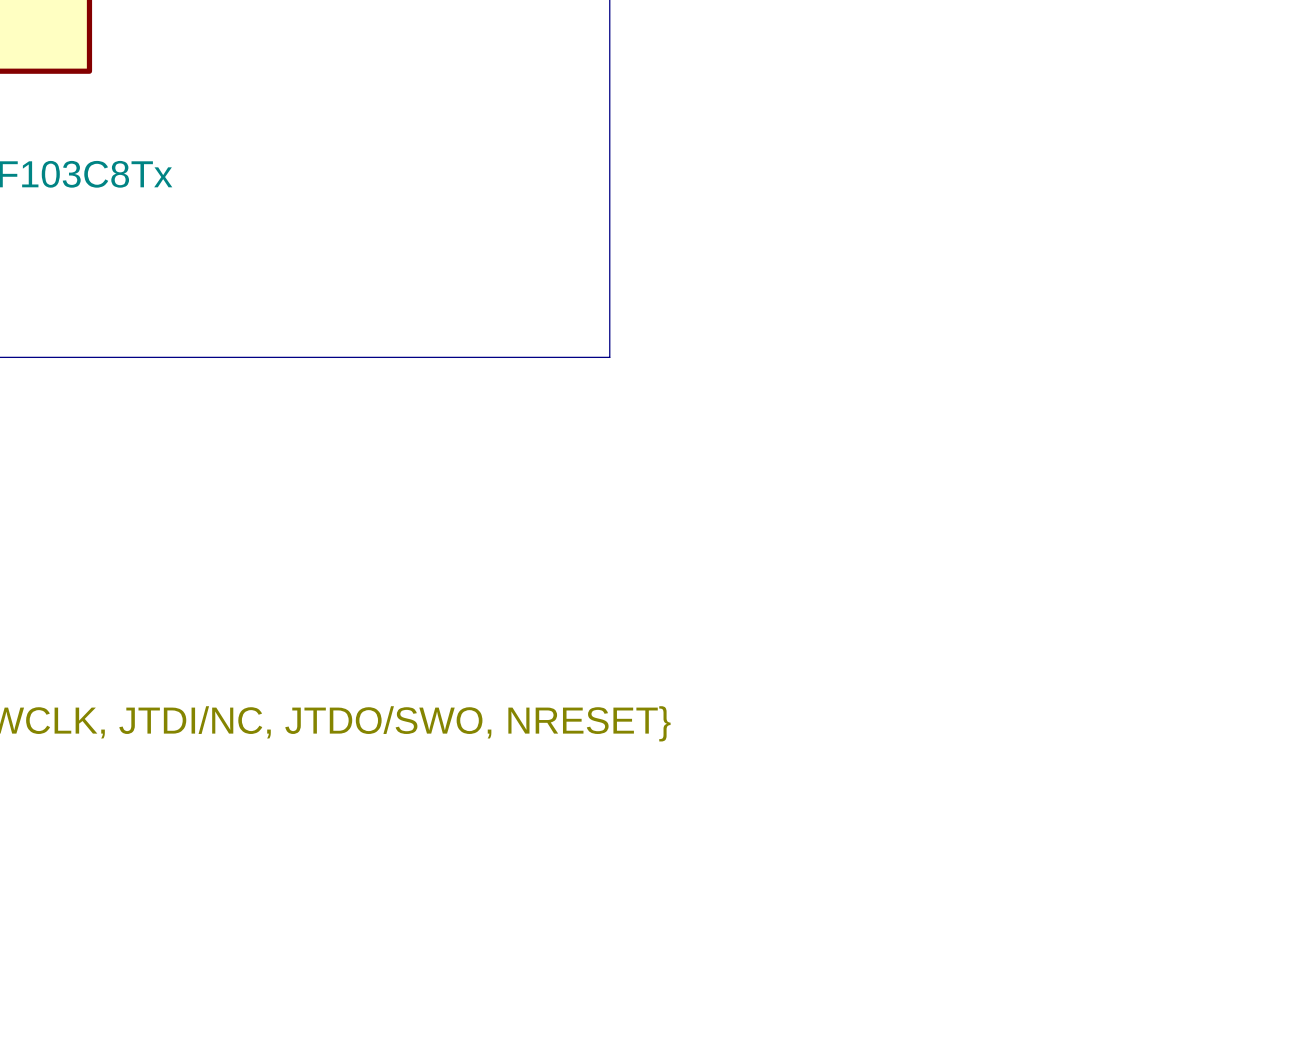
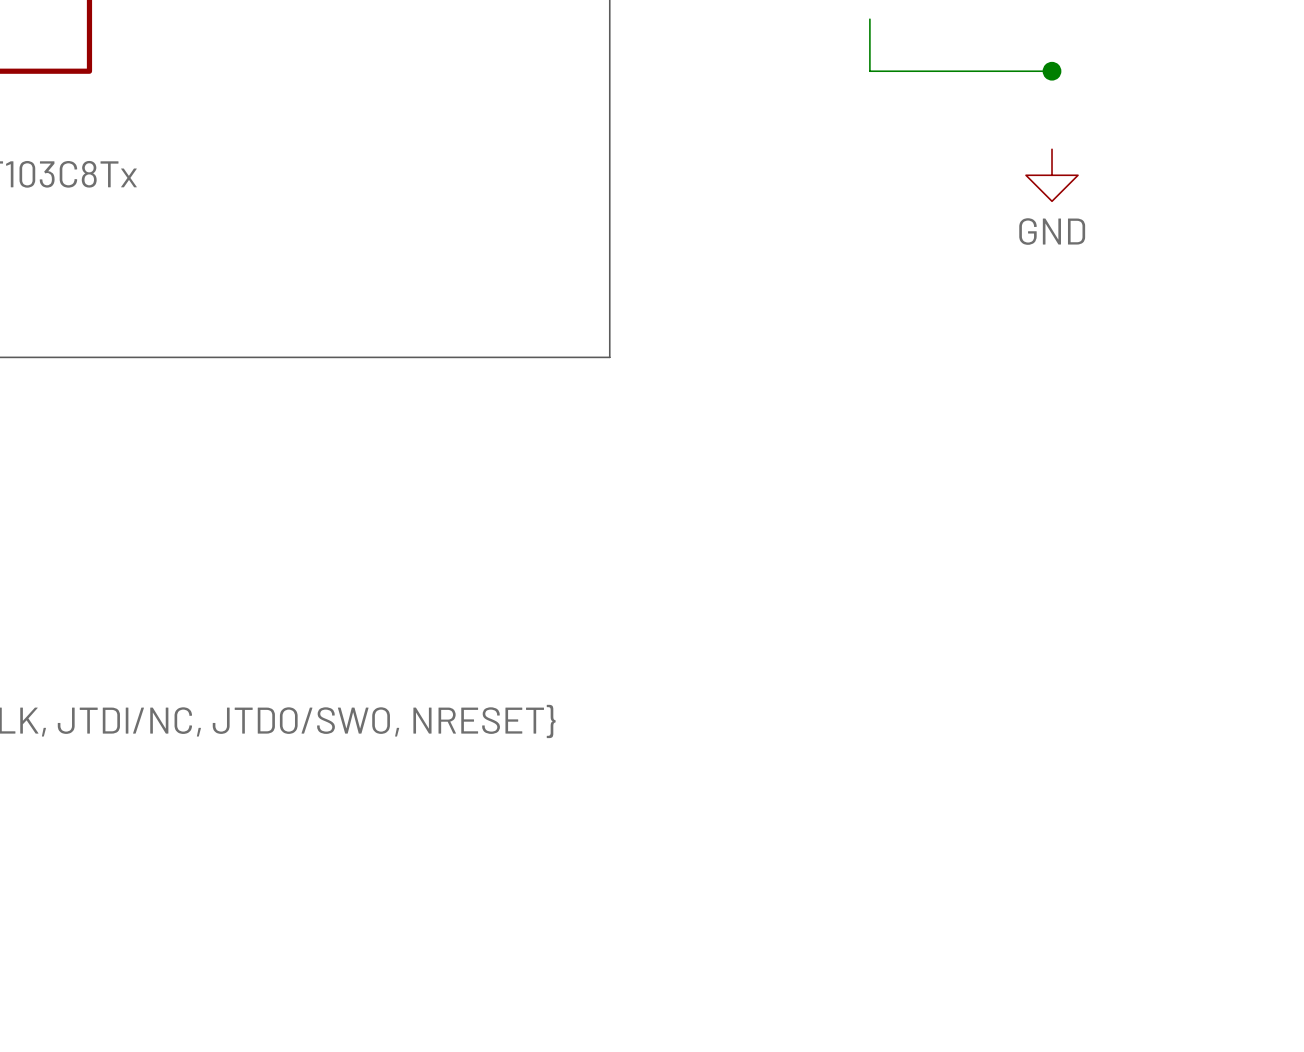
wire: none -> (869, 19) (869, 71) (1052, 71)
junction: none -> (1052, 71)
power symbol: none -> GND (1052, 175)

